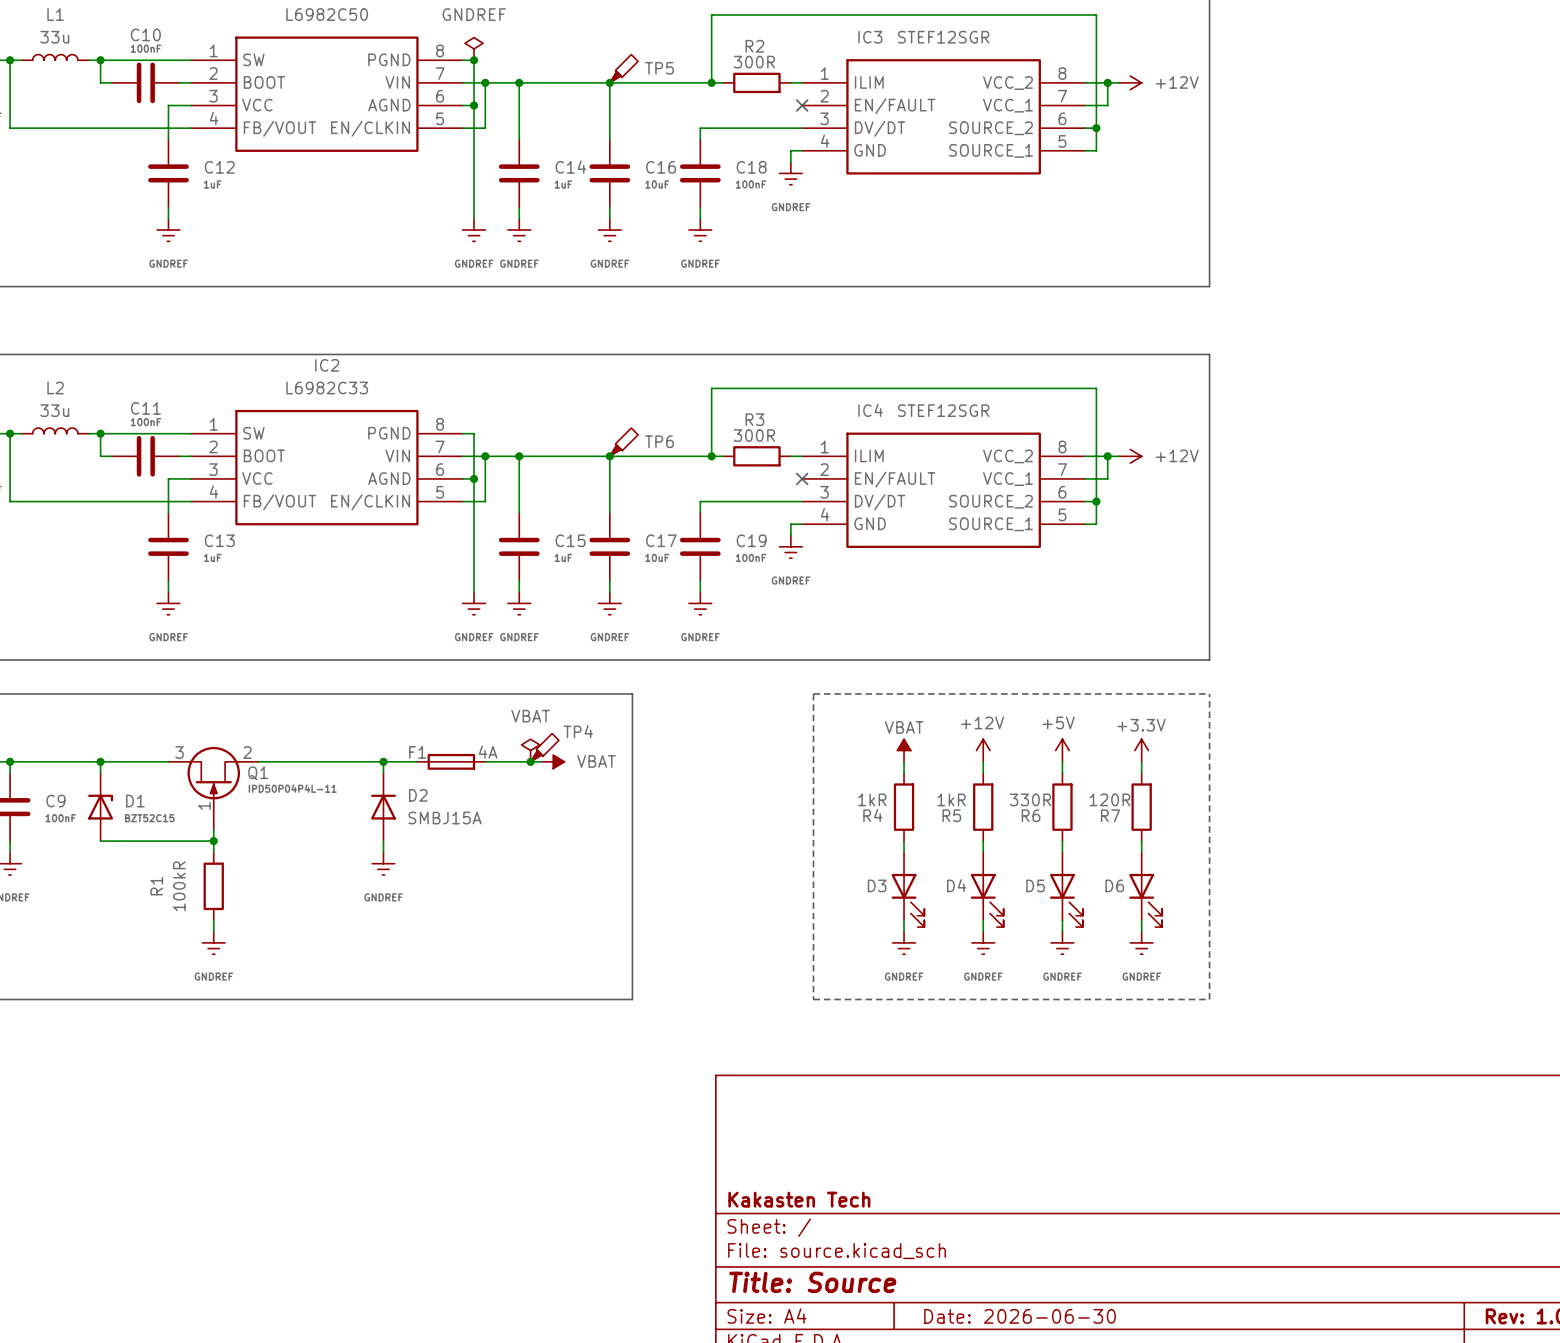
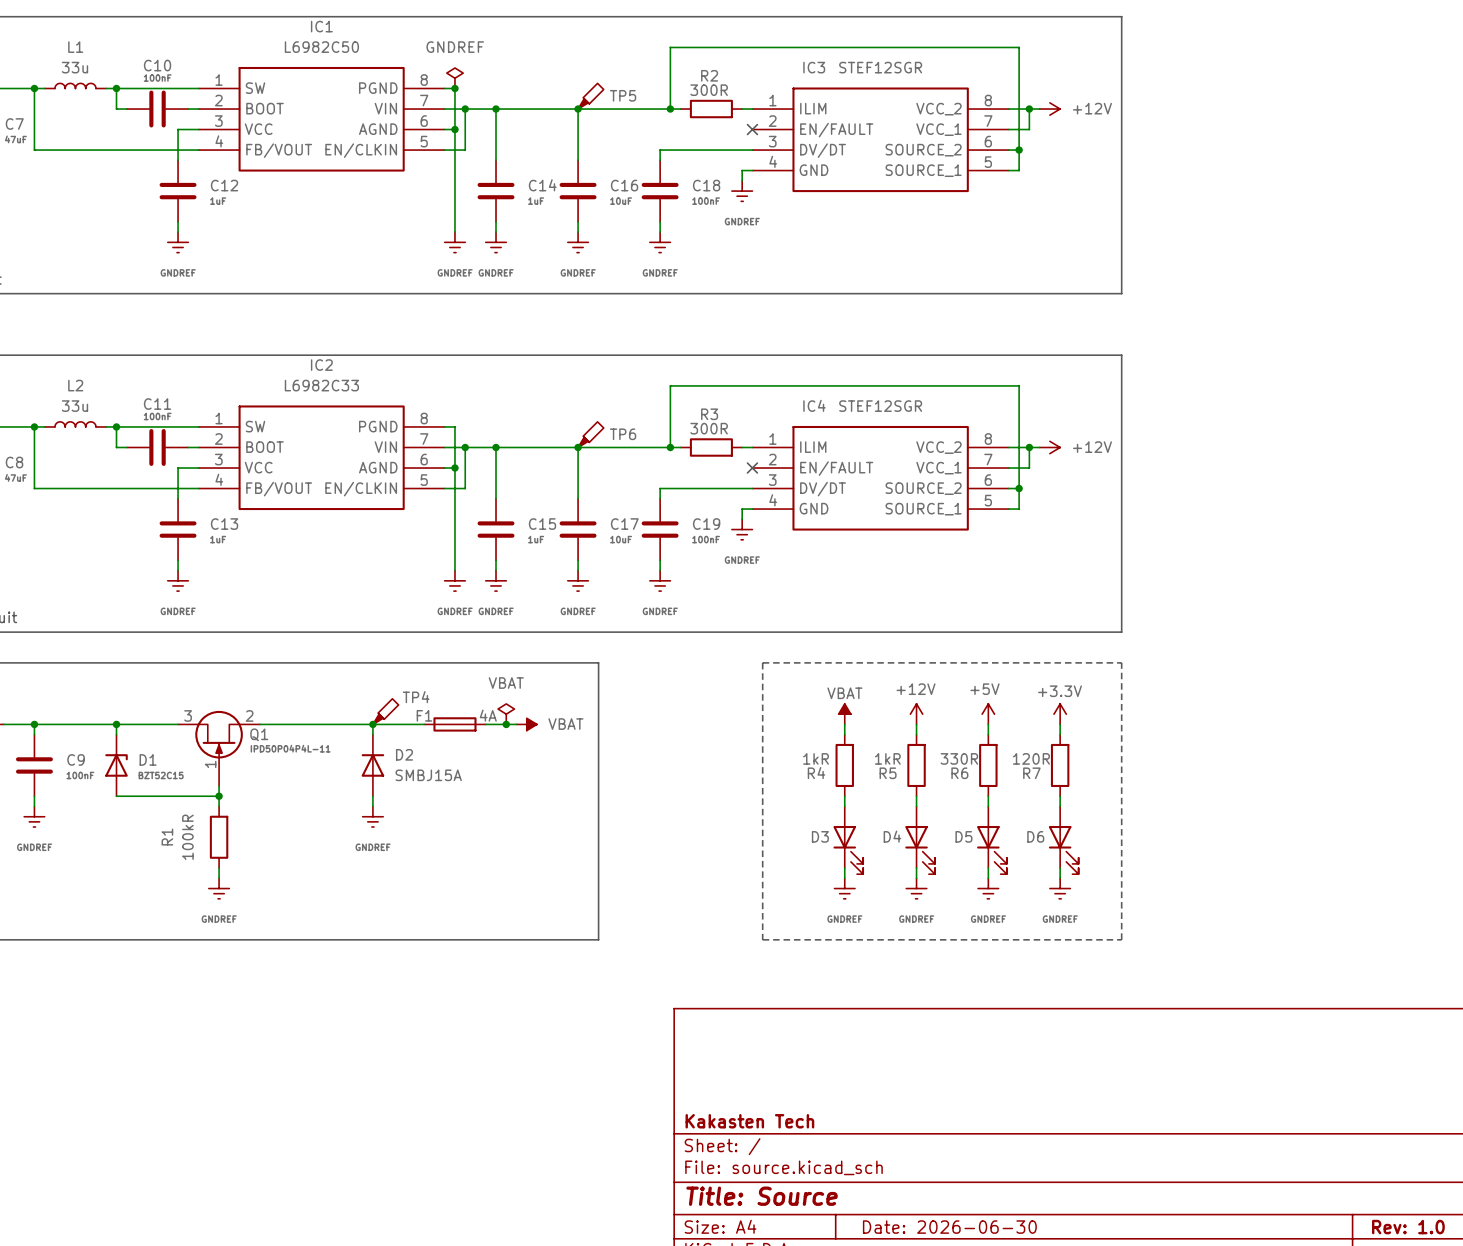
TP4 position: (544, 747) -> (385, 711)
F1 position: (451, 761) -> (454, 724)

